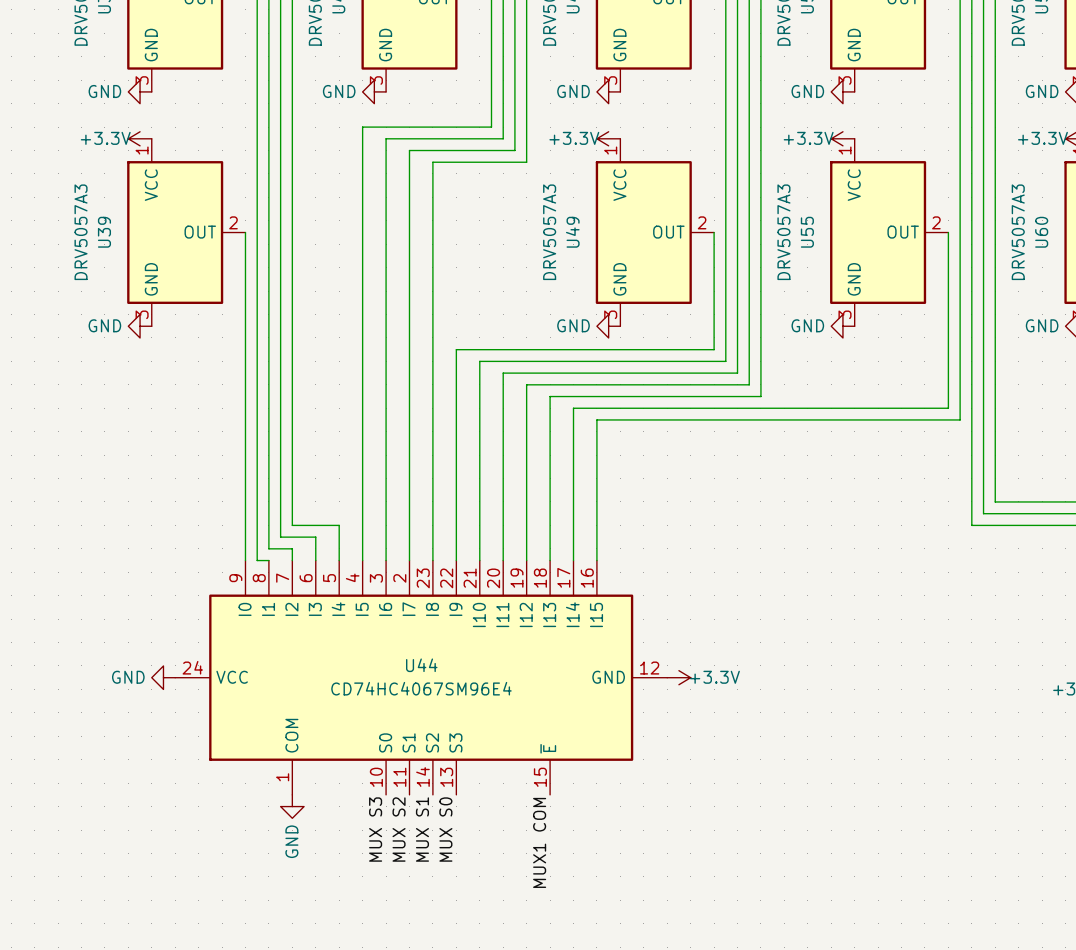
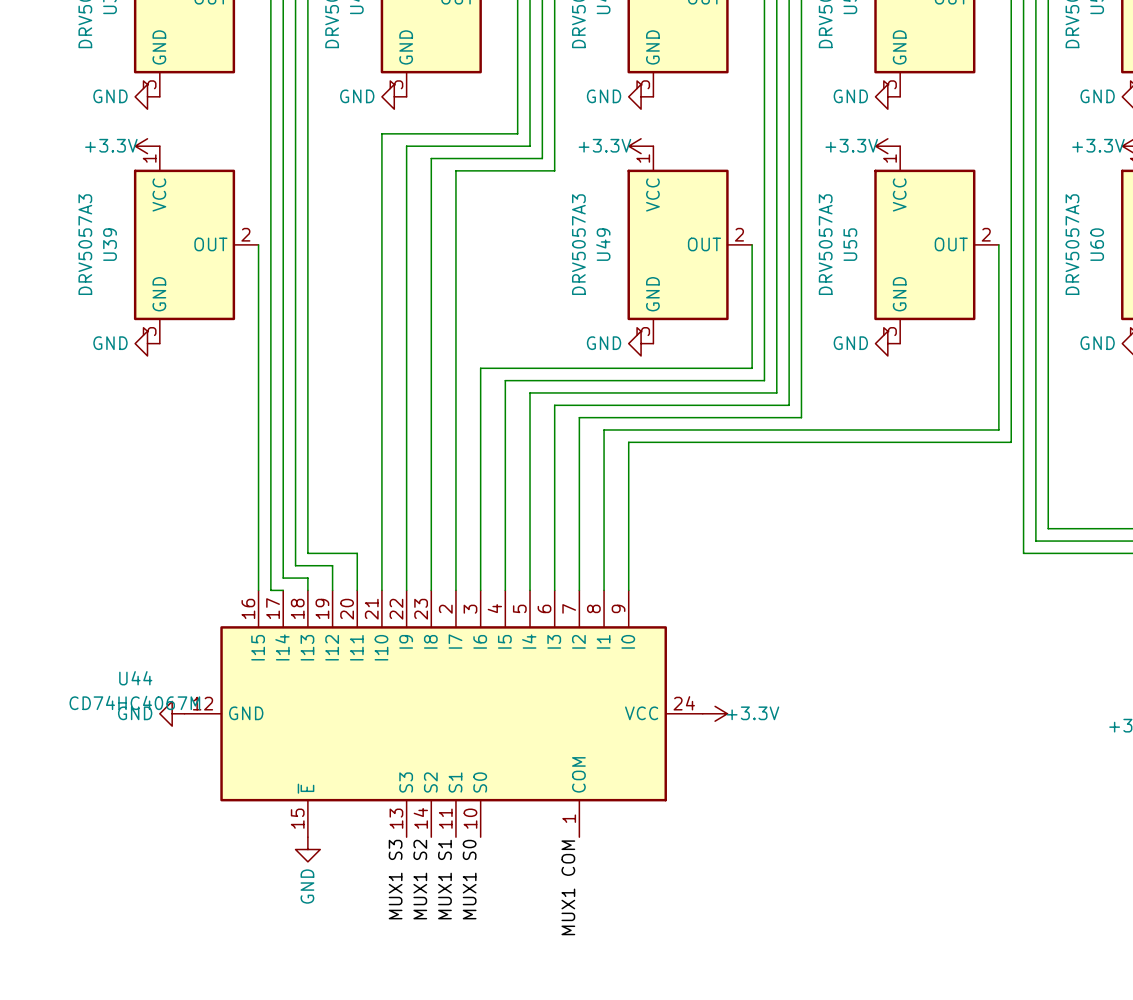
U44 name position: U44 (421, 665) -> U44 (135, 678)
U44 flip: as is (421, 677) -> left-right (443, 713)
U44 value: CD74HC4067SM96E4 (421, 688) -> CD74HC4067M (134, 702)
label: MUX S3 (375, 829) -> MUX1 S3 (395, 879)
label: MUX S2 (399, 829) -> MUX1 S2 (420, 879)
label: MUX S1 (422, 829) -> MUX1 S1 (444, 879)
label: MUX S0 (445, 829) -> MUX1 S0 (469, 879)

